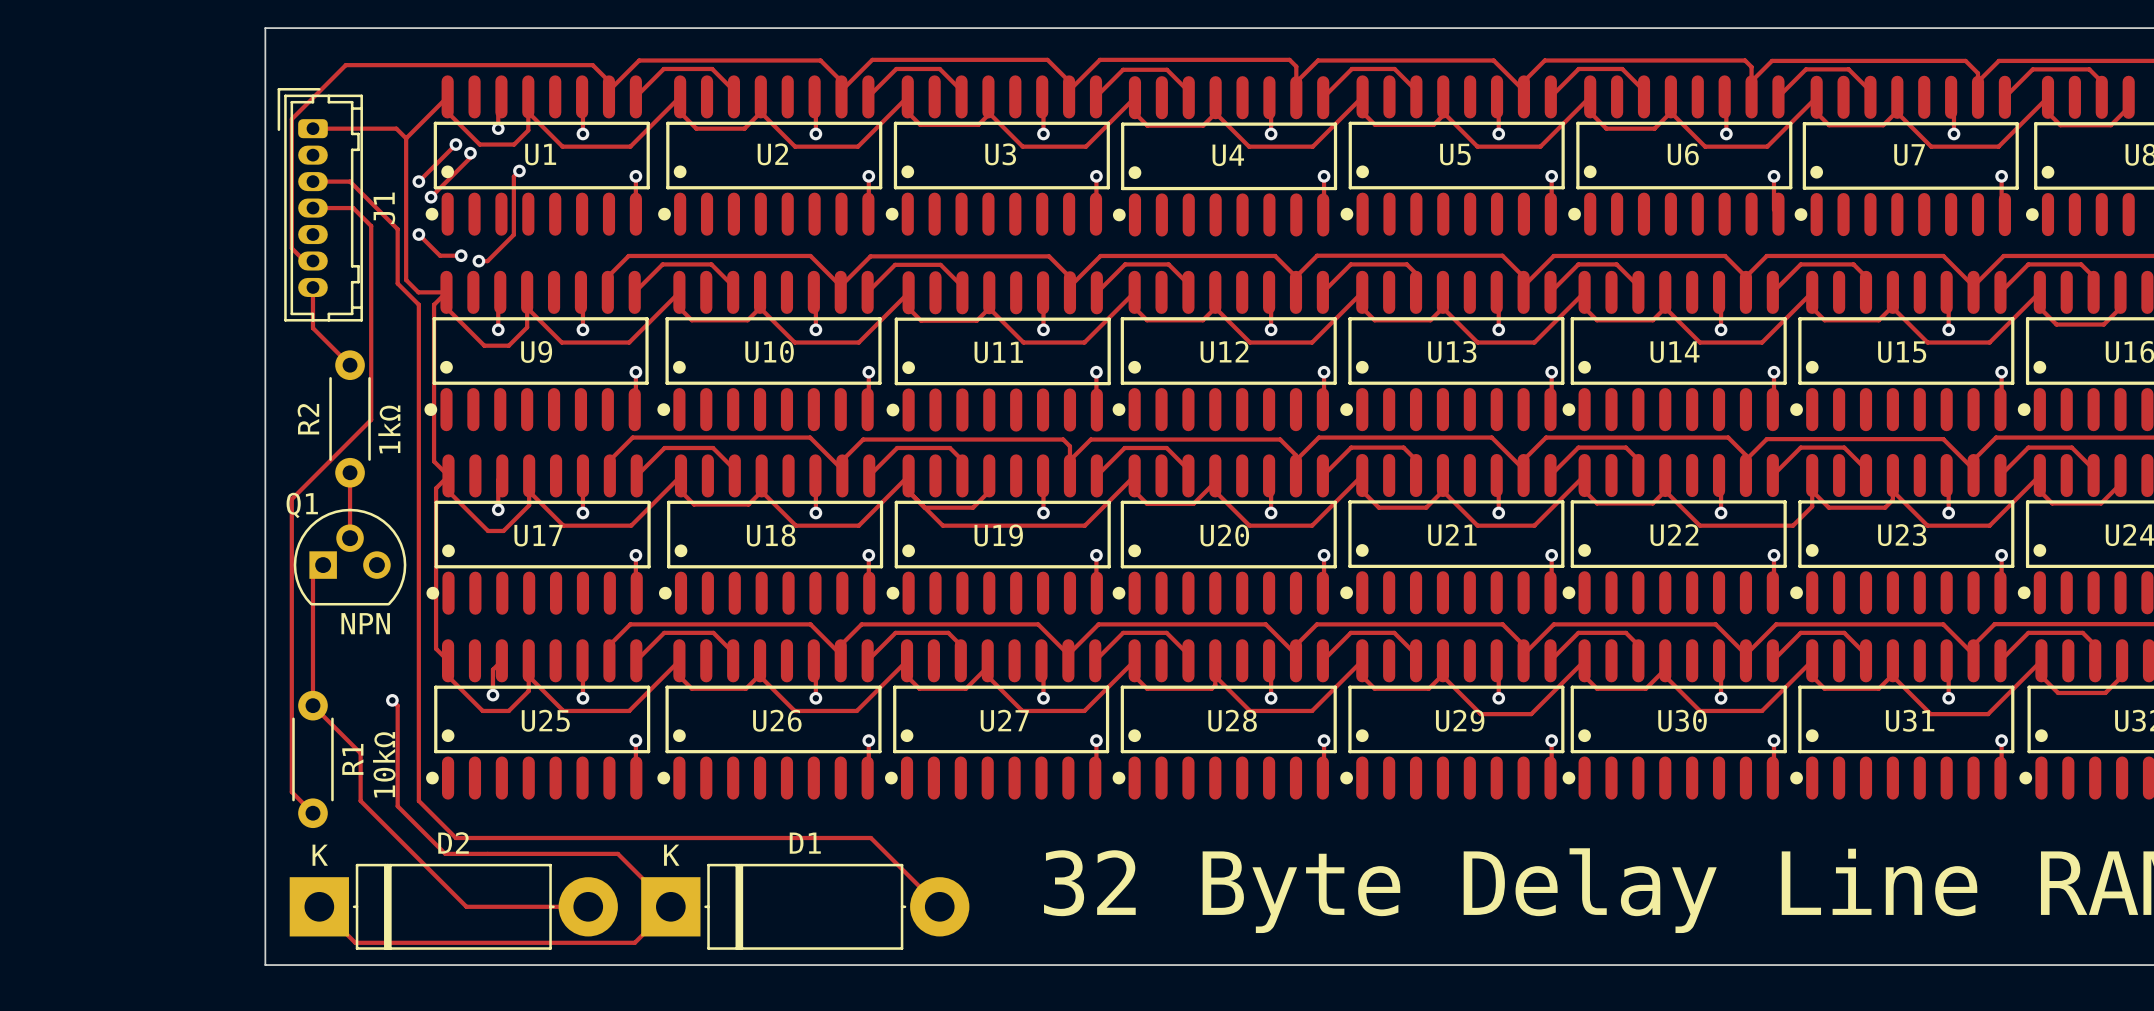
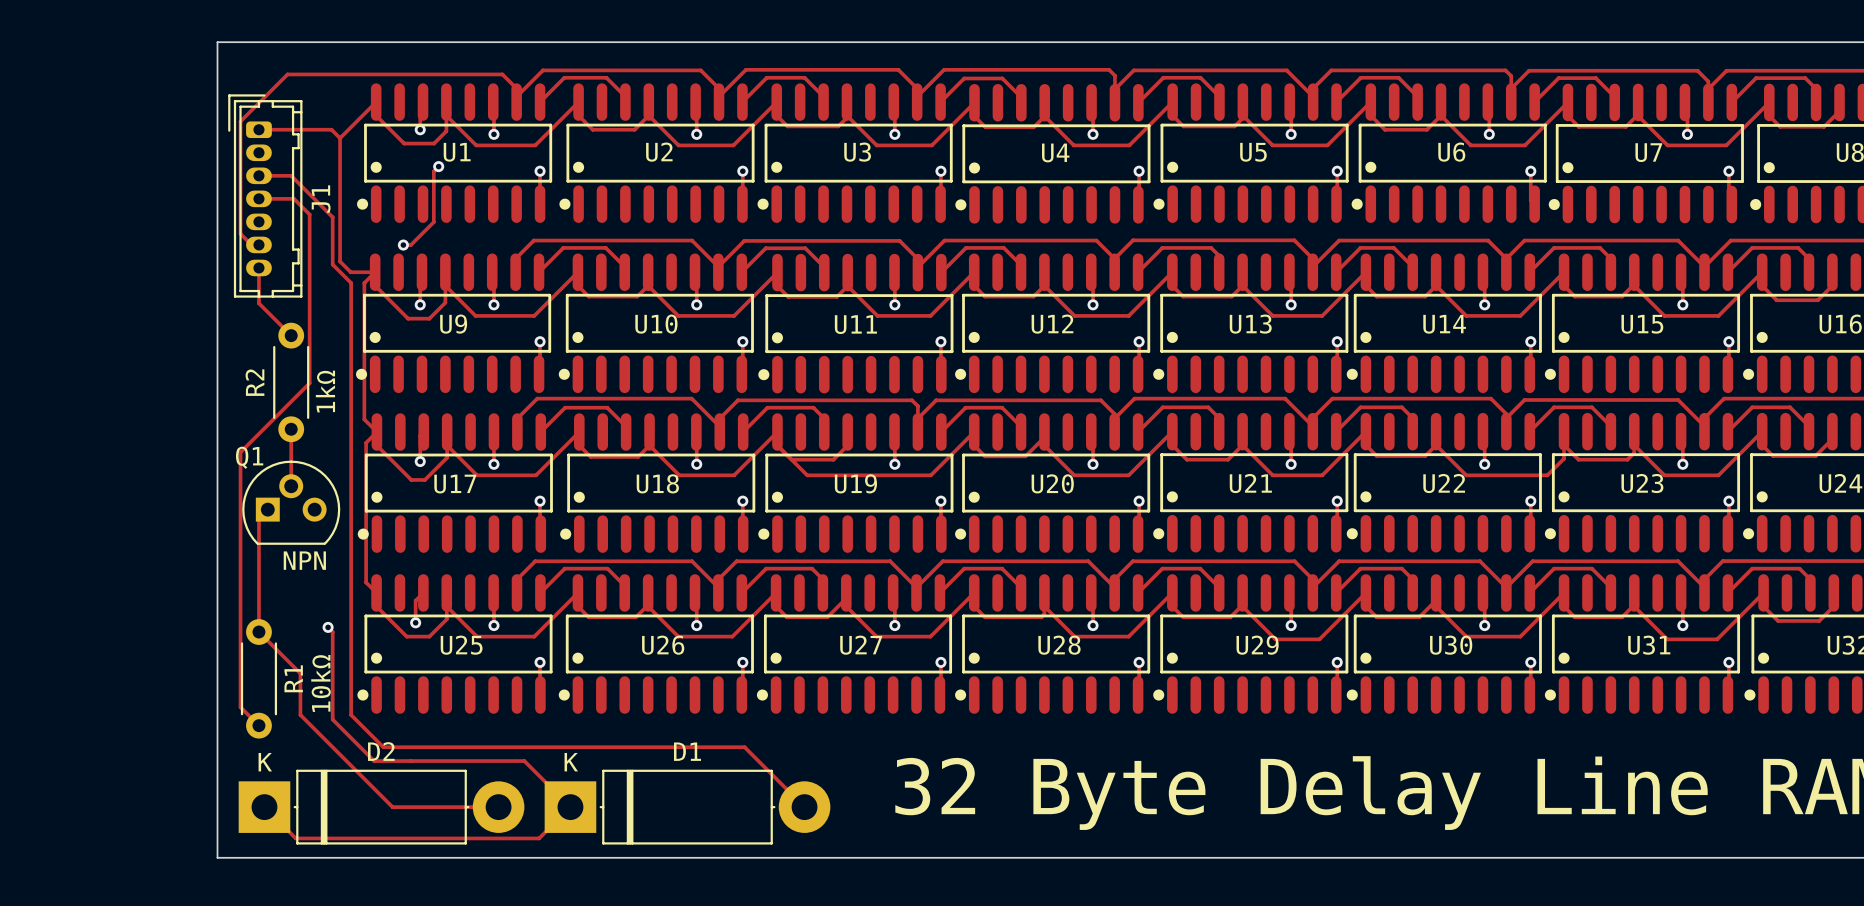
track: (455, 144) (418, 181) -> none
via: (455, 144) -> none
track: (470, 153) (470, 157) (431, 197) -> none
via: (470, 153) -> none
via: (418, 181) -> none
via: (431, 197) -> none
track: (418, 234) (440, 255) (461, 255) -> none
via: (418, 234) -> none
via: (461, 255) -> none

